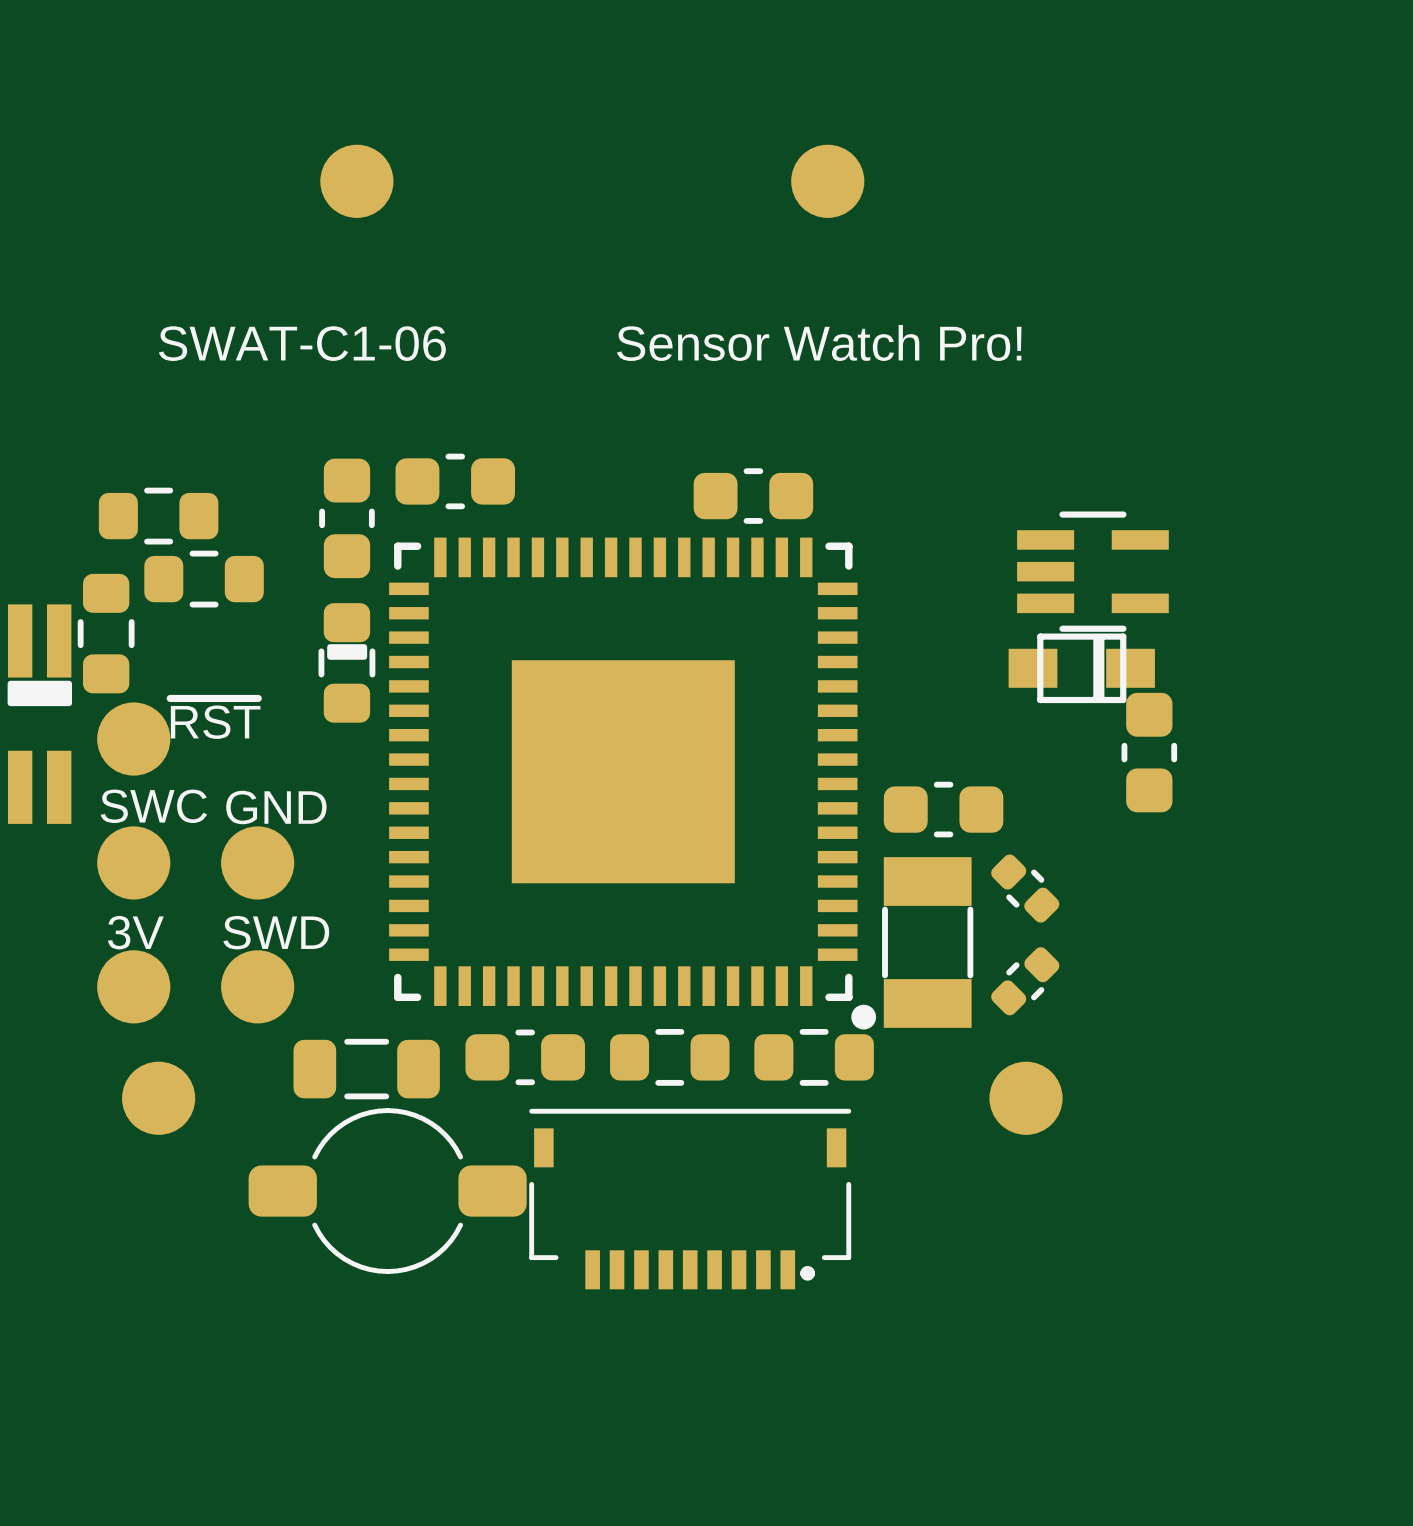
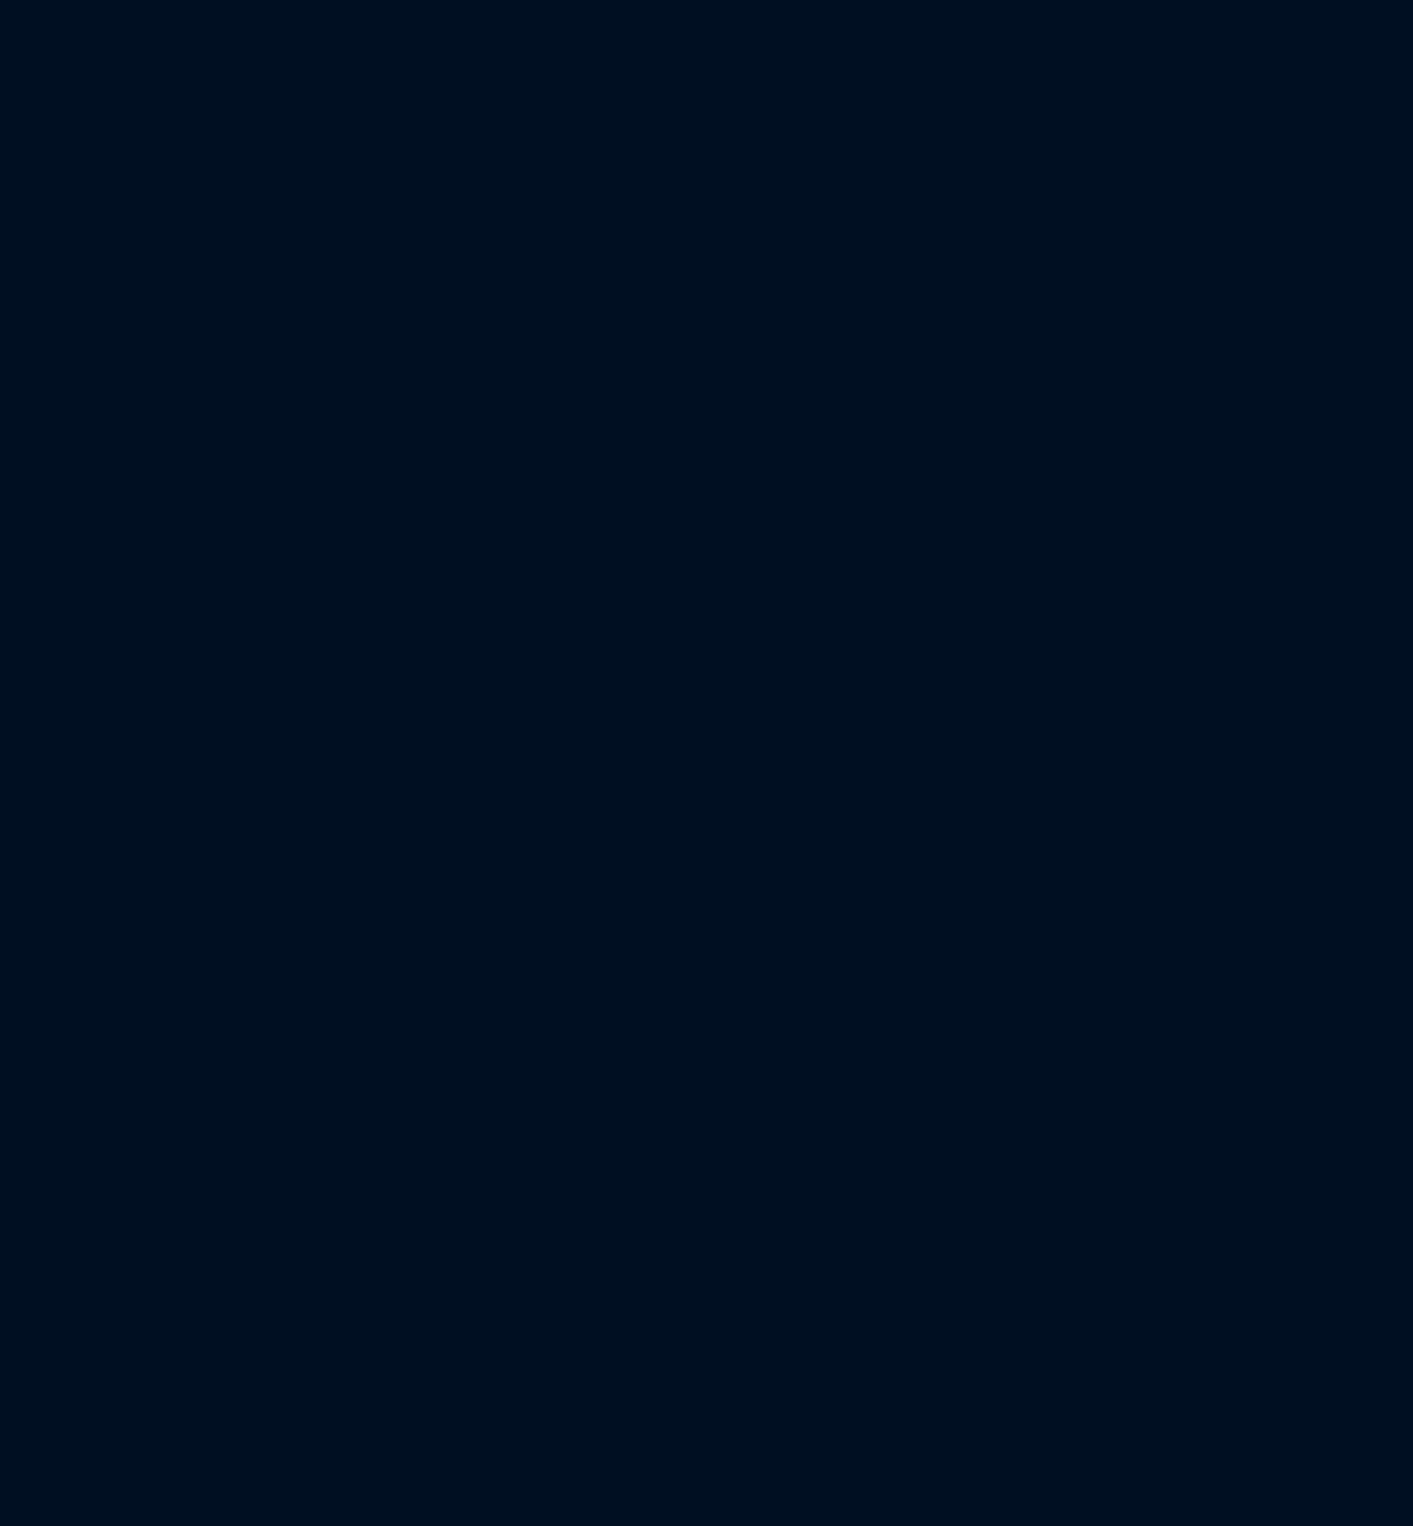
part: (356, 181) -> none
part: (827, 181) -> none
text: Sensor Watch Pro! (819, 342) -> none
text: SWAT-C1-06 (302, 343) -> none
part: (455, 481) -> none
part: (753, 496) -> none
part: (158, 516) -> none
part: (346, 518) -> none
part: (1092, 571) -> none
part: (204, 579) -> none
part: (106, 633) -> none
drawing: [327, 644, 368, 660] -> none
part: (346, 662) -> none
part: (1081, 668) -> none
drawing: [7, 680, 73, 707] -> none
part: (39, 714) -> none
text: ~{RST} (215, 718) -> none
part: (1149, 752) -> none
part: (632, 783) -> none
text: SWC (153, 806) -> none
text: GND (276, 807) -> none
part: (943, 809) -> none
part: (195, 862) -> none
part: (1025, 888) -> none
text: 3V (135, 932) -> none
text: SWD (276, 932) -> none
part: (927, 942) -> none
part: (1025, 981) -> none
part: (525, 1057) -> none
part: (669, 1057) -> none
part: (814, 1057) -> none
part: (366, 1069) -> none
part: (158, 1098) -> none
part: (1026, 1098) -> none
part: (387, 1191) -> none
part: (690, 1199) -> none

